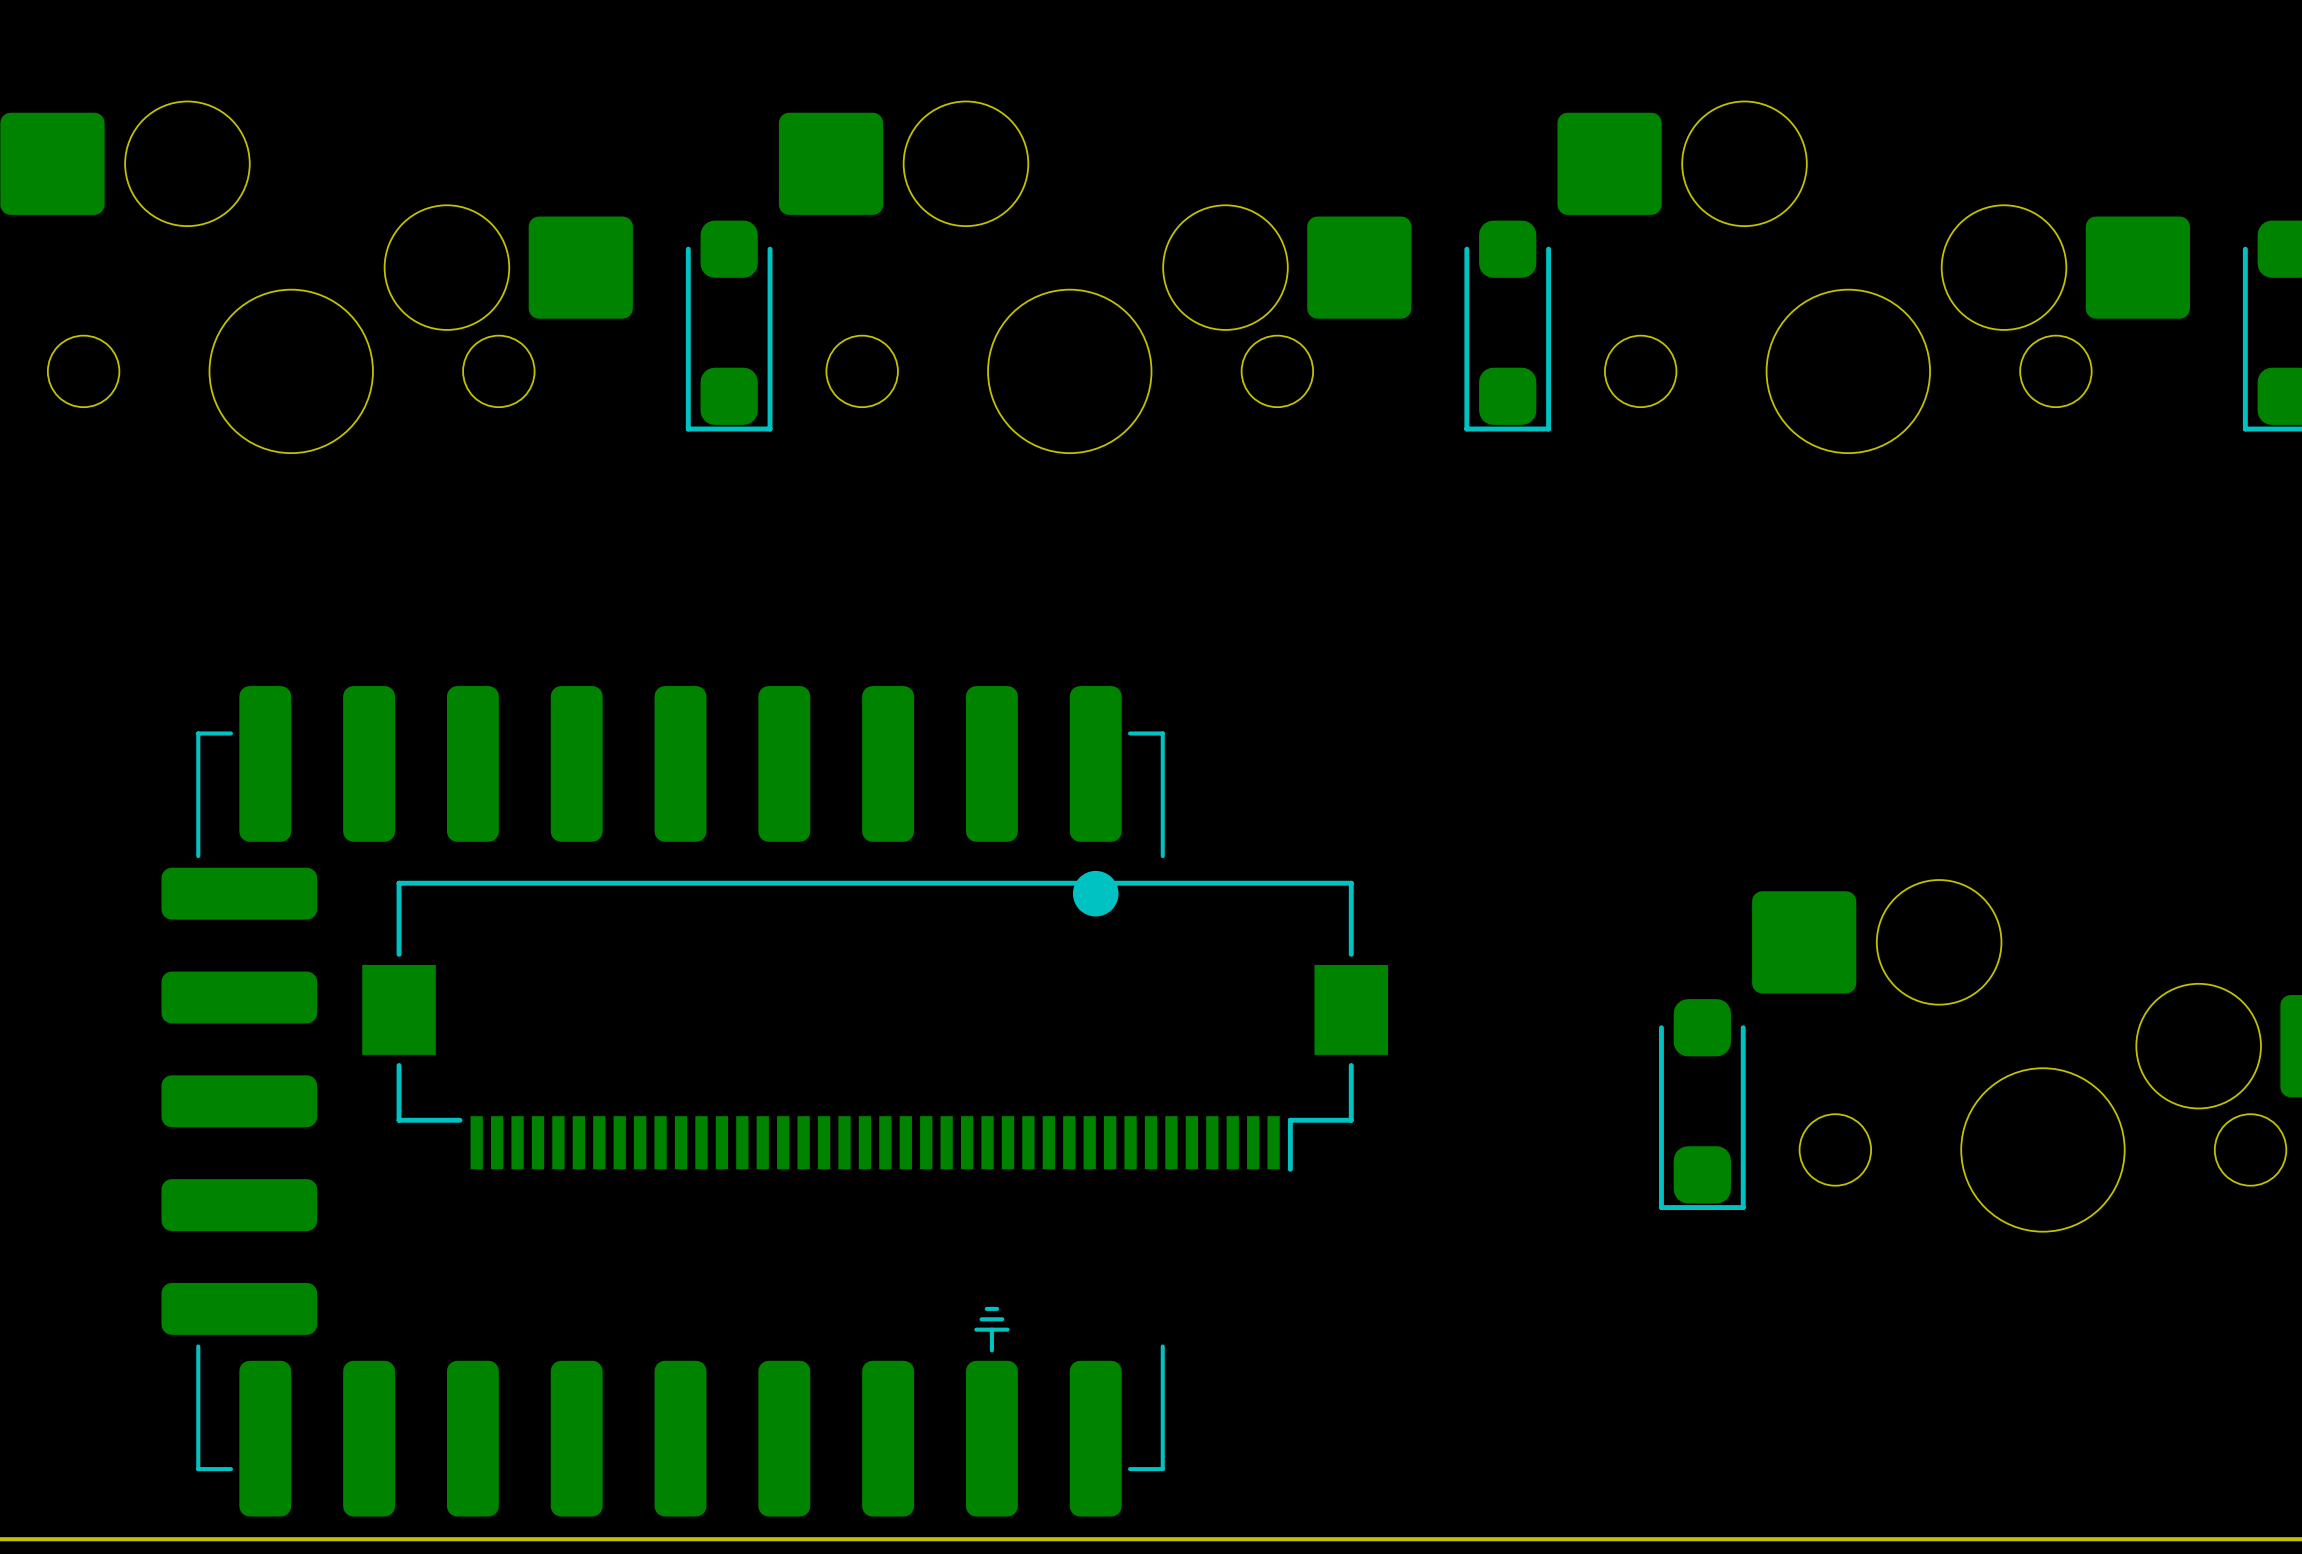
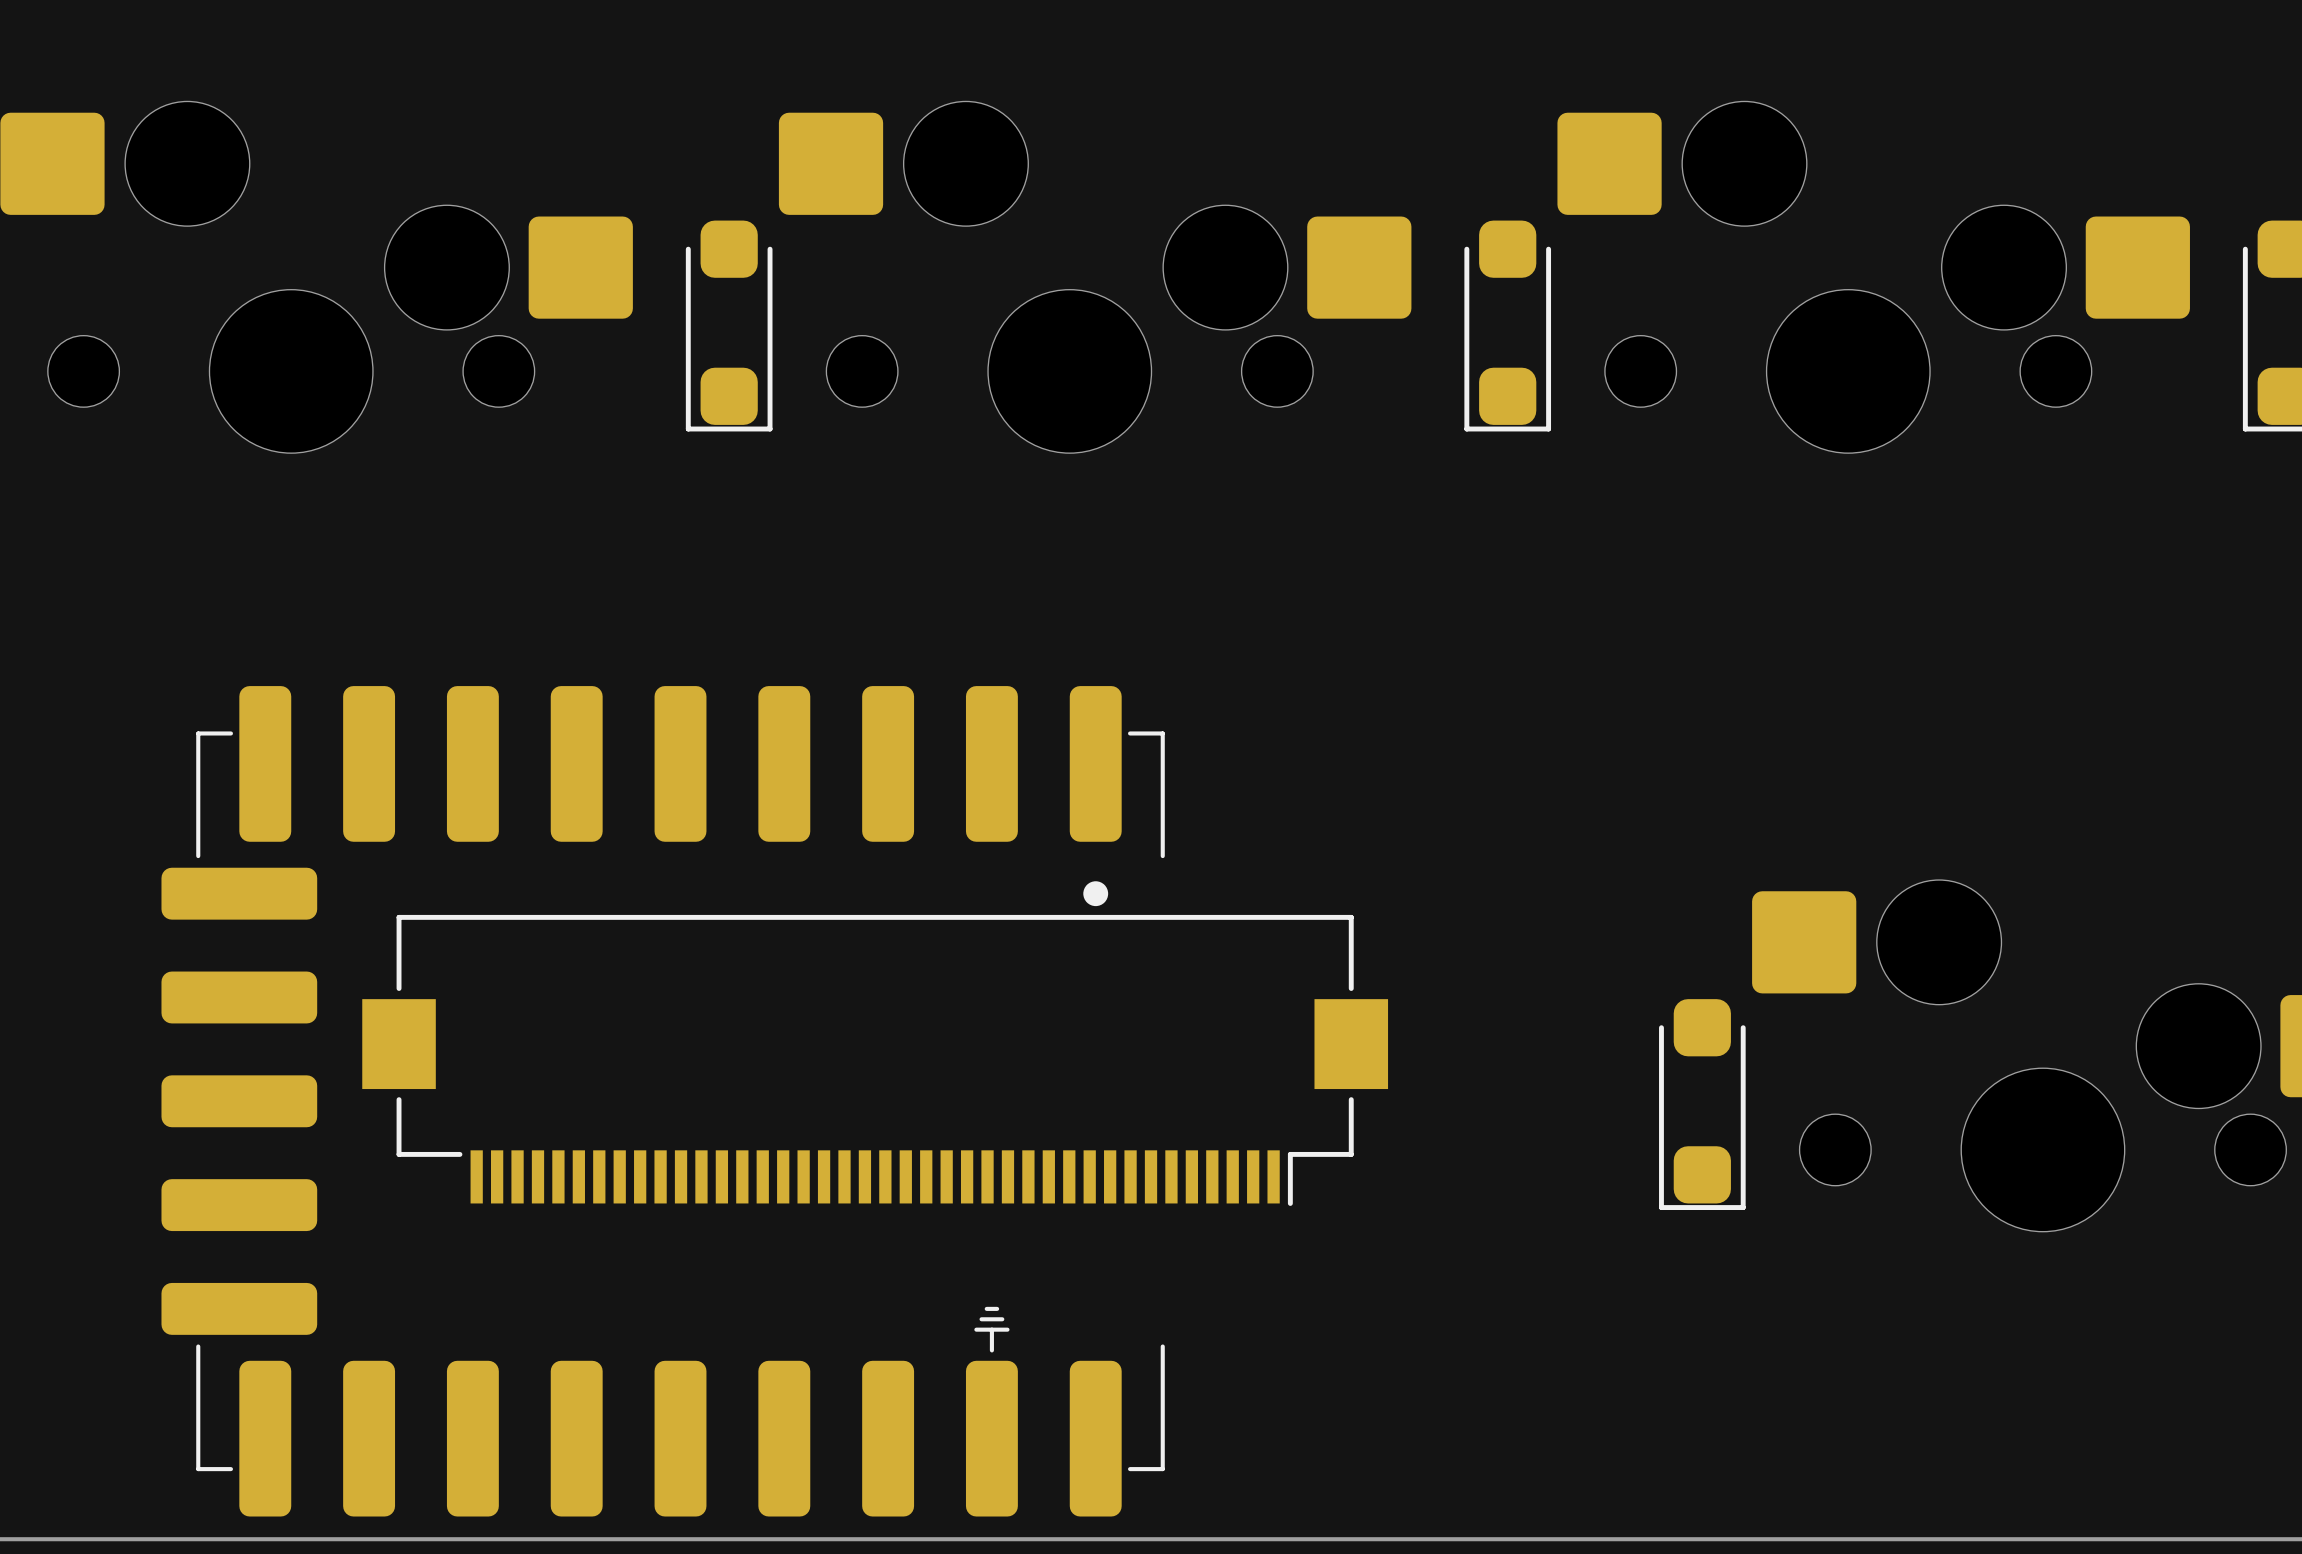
part footprint: [161, 686, 1165, 1517] -> [161, 686, 1165, 1517]
part position: (875, 1026) -> (875, 1060)

